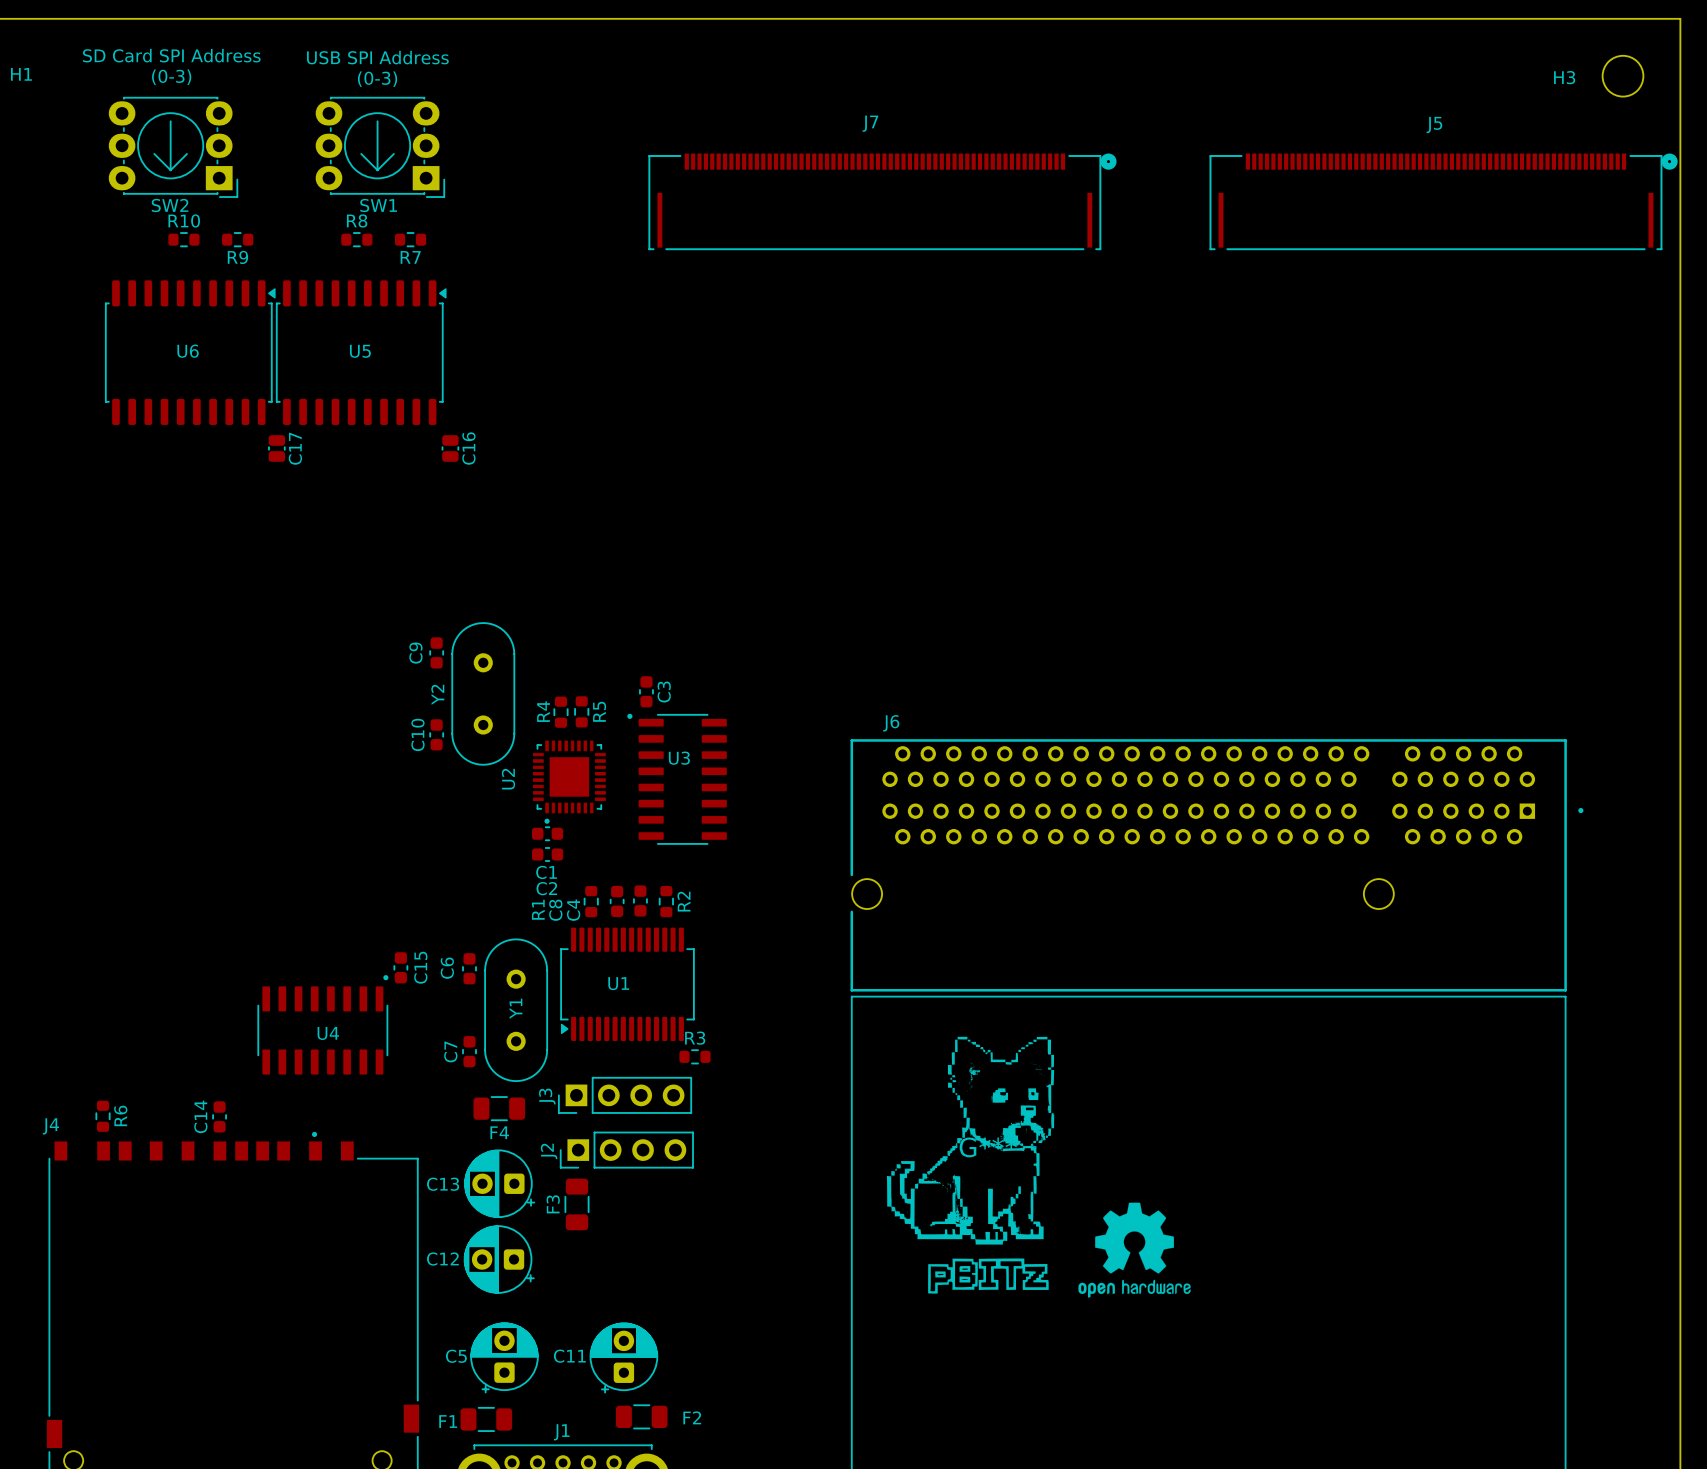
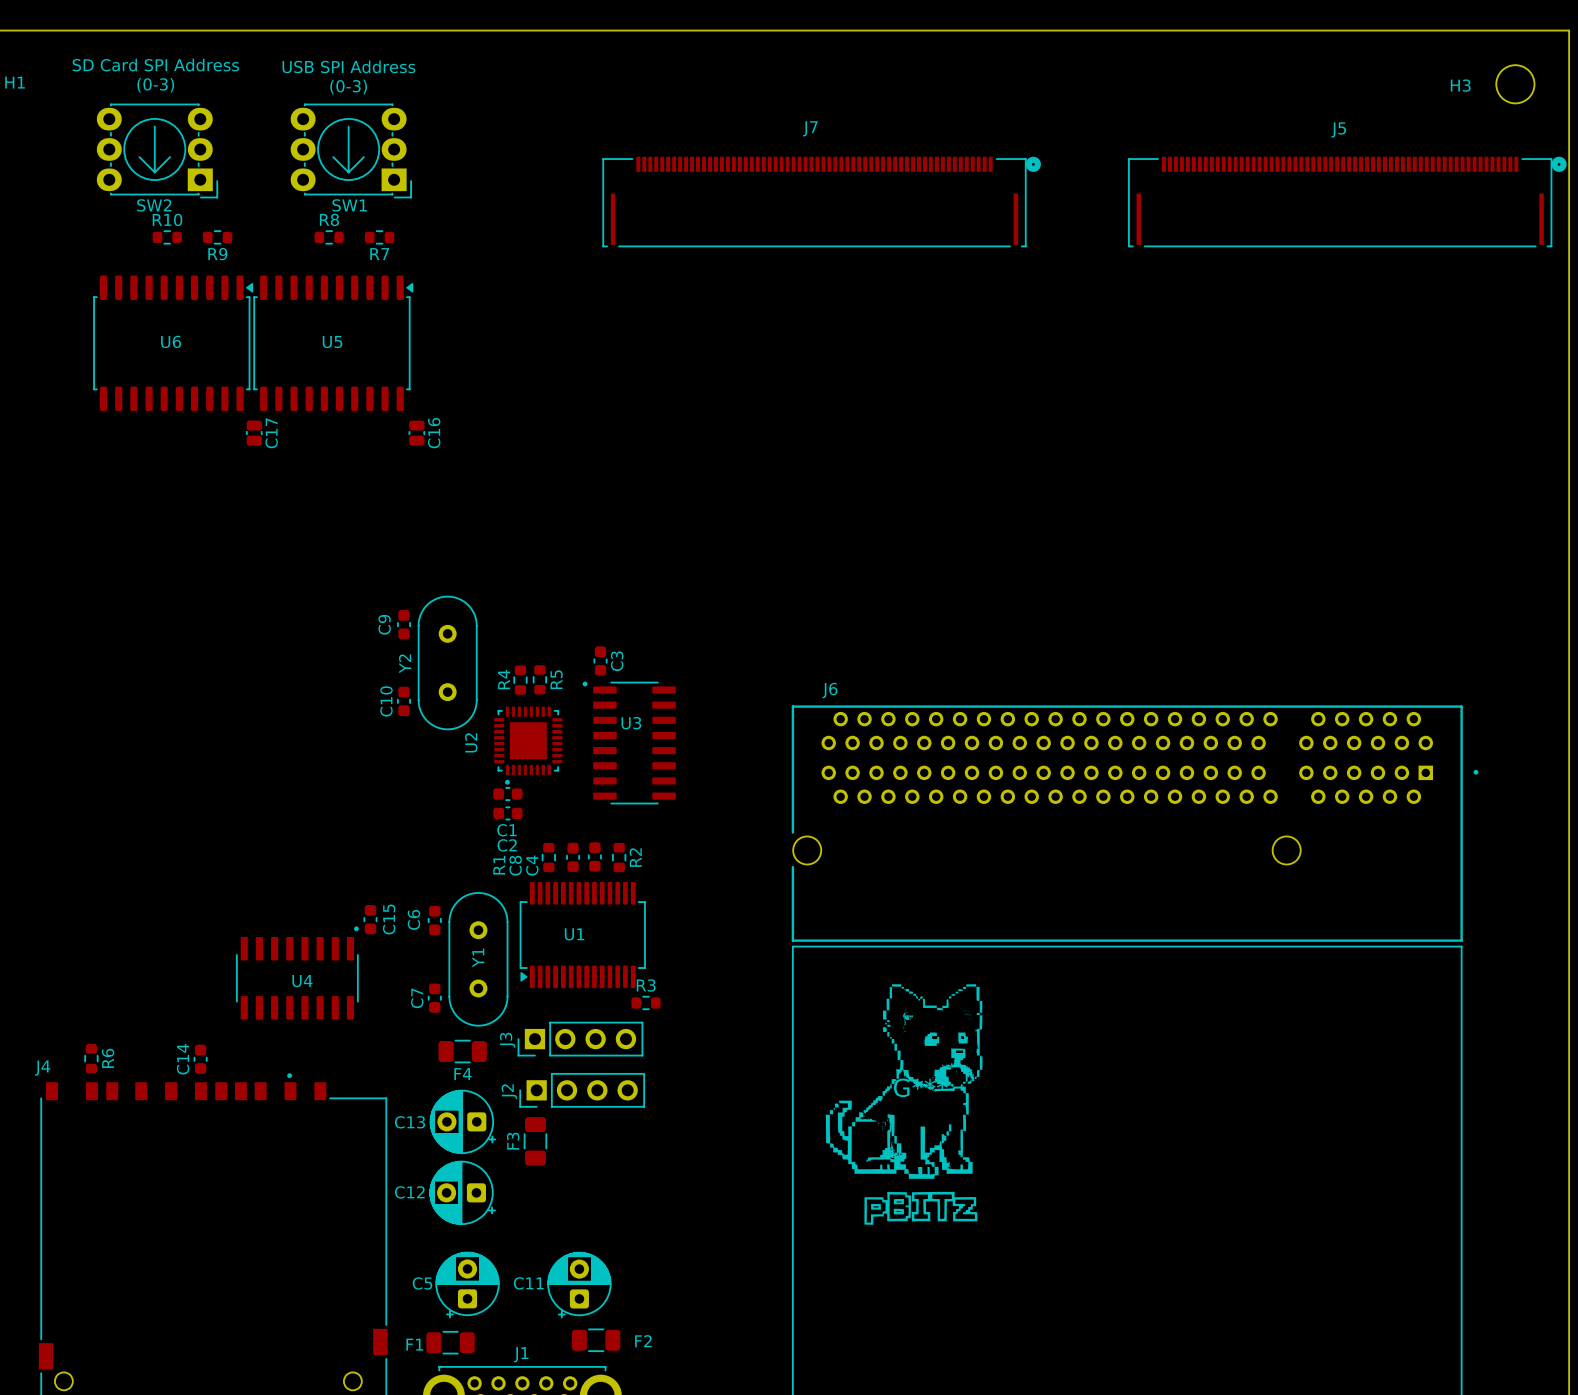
drawing: [1078, 1202, 1191, 1298] -> none

